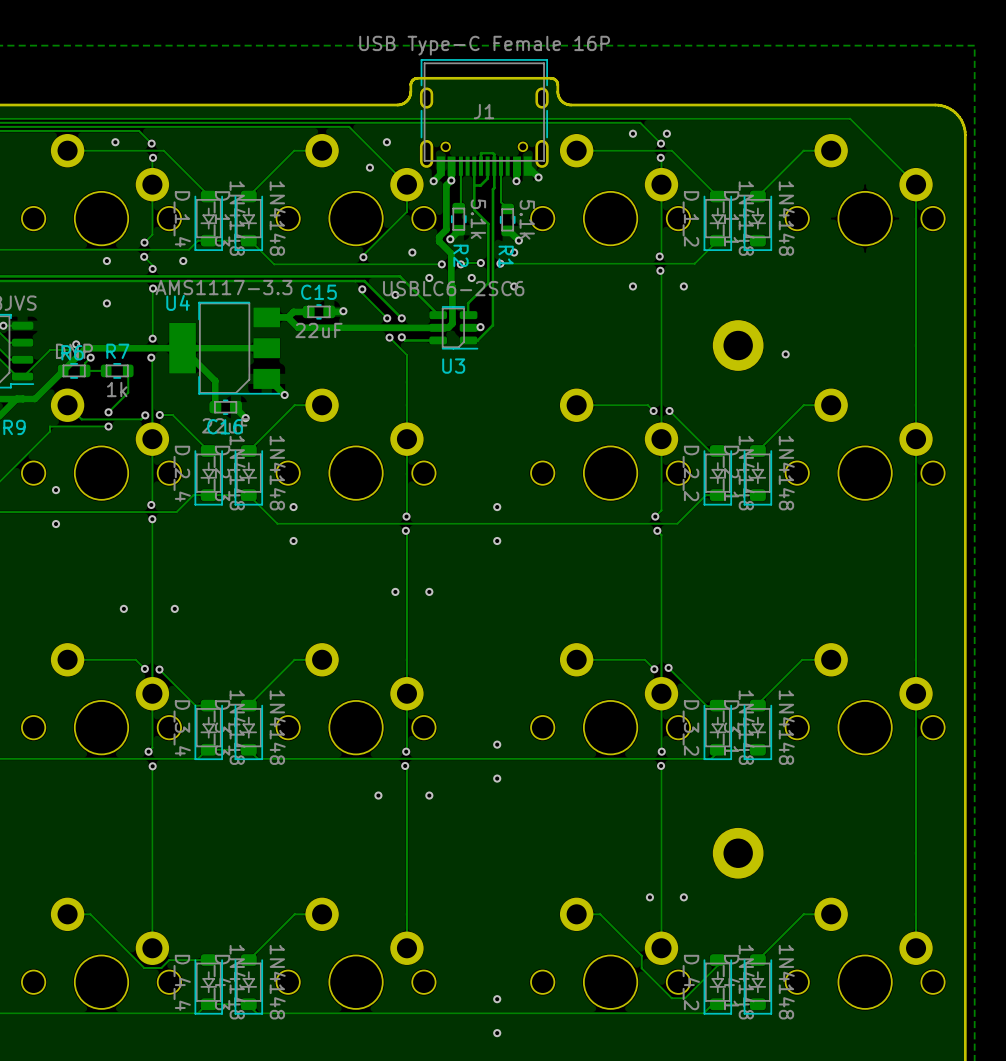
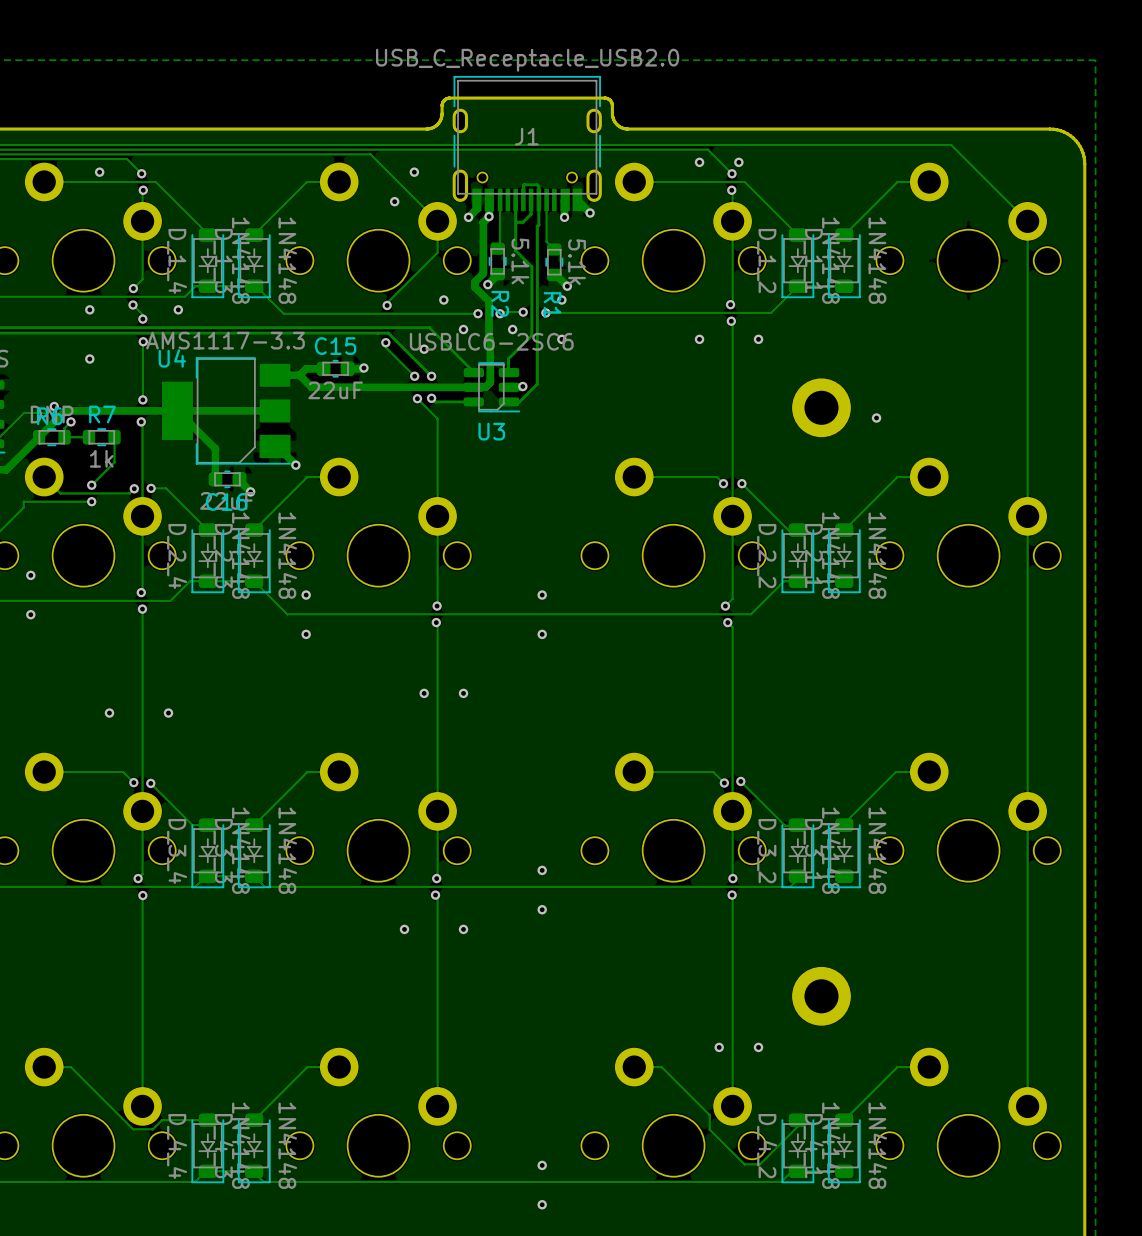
J1 value: USB Type-C Female 16P (484, 45) -> USB_C_Receptacle_USB2.0 (527, 60)

